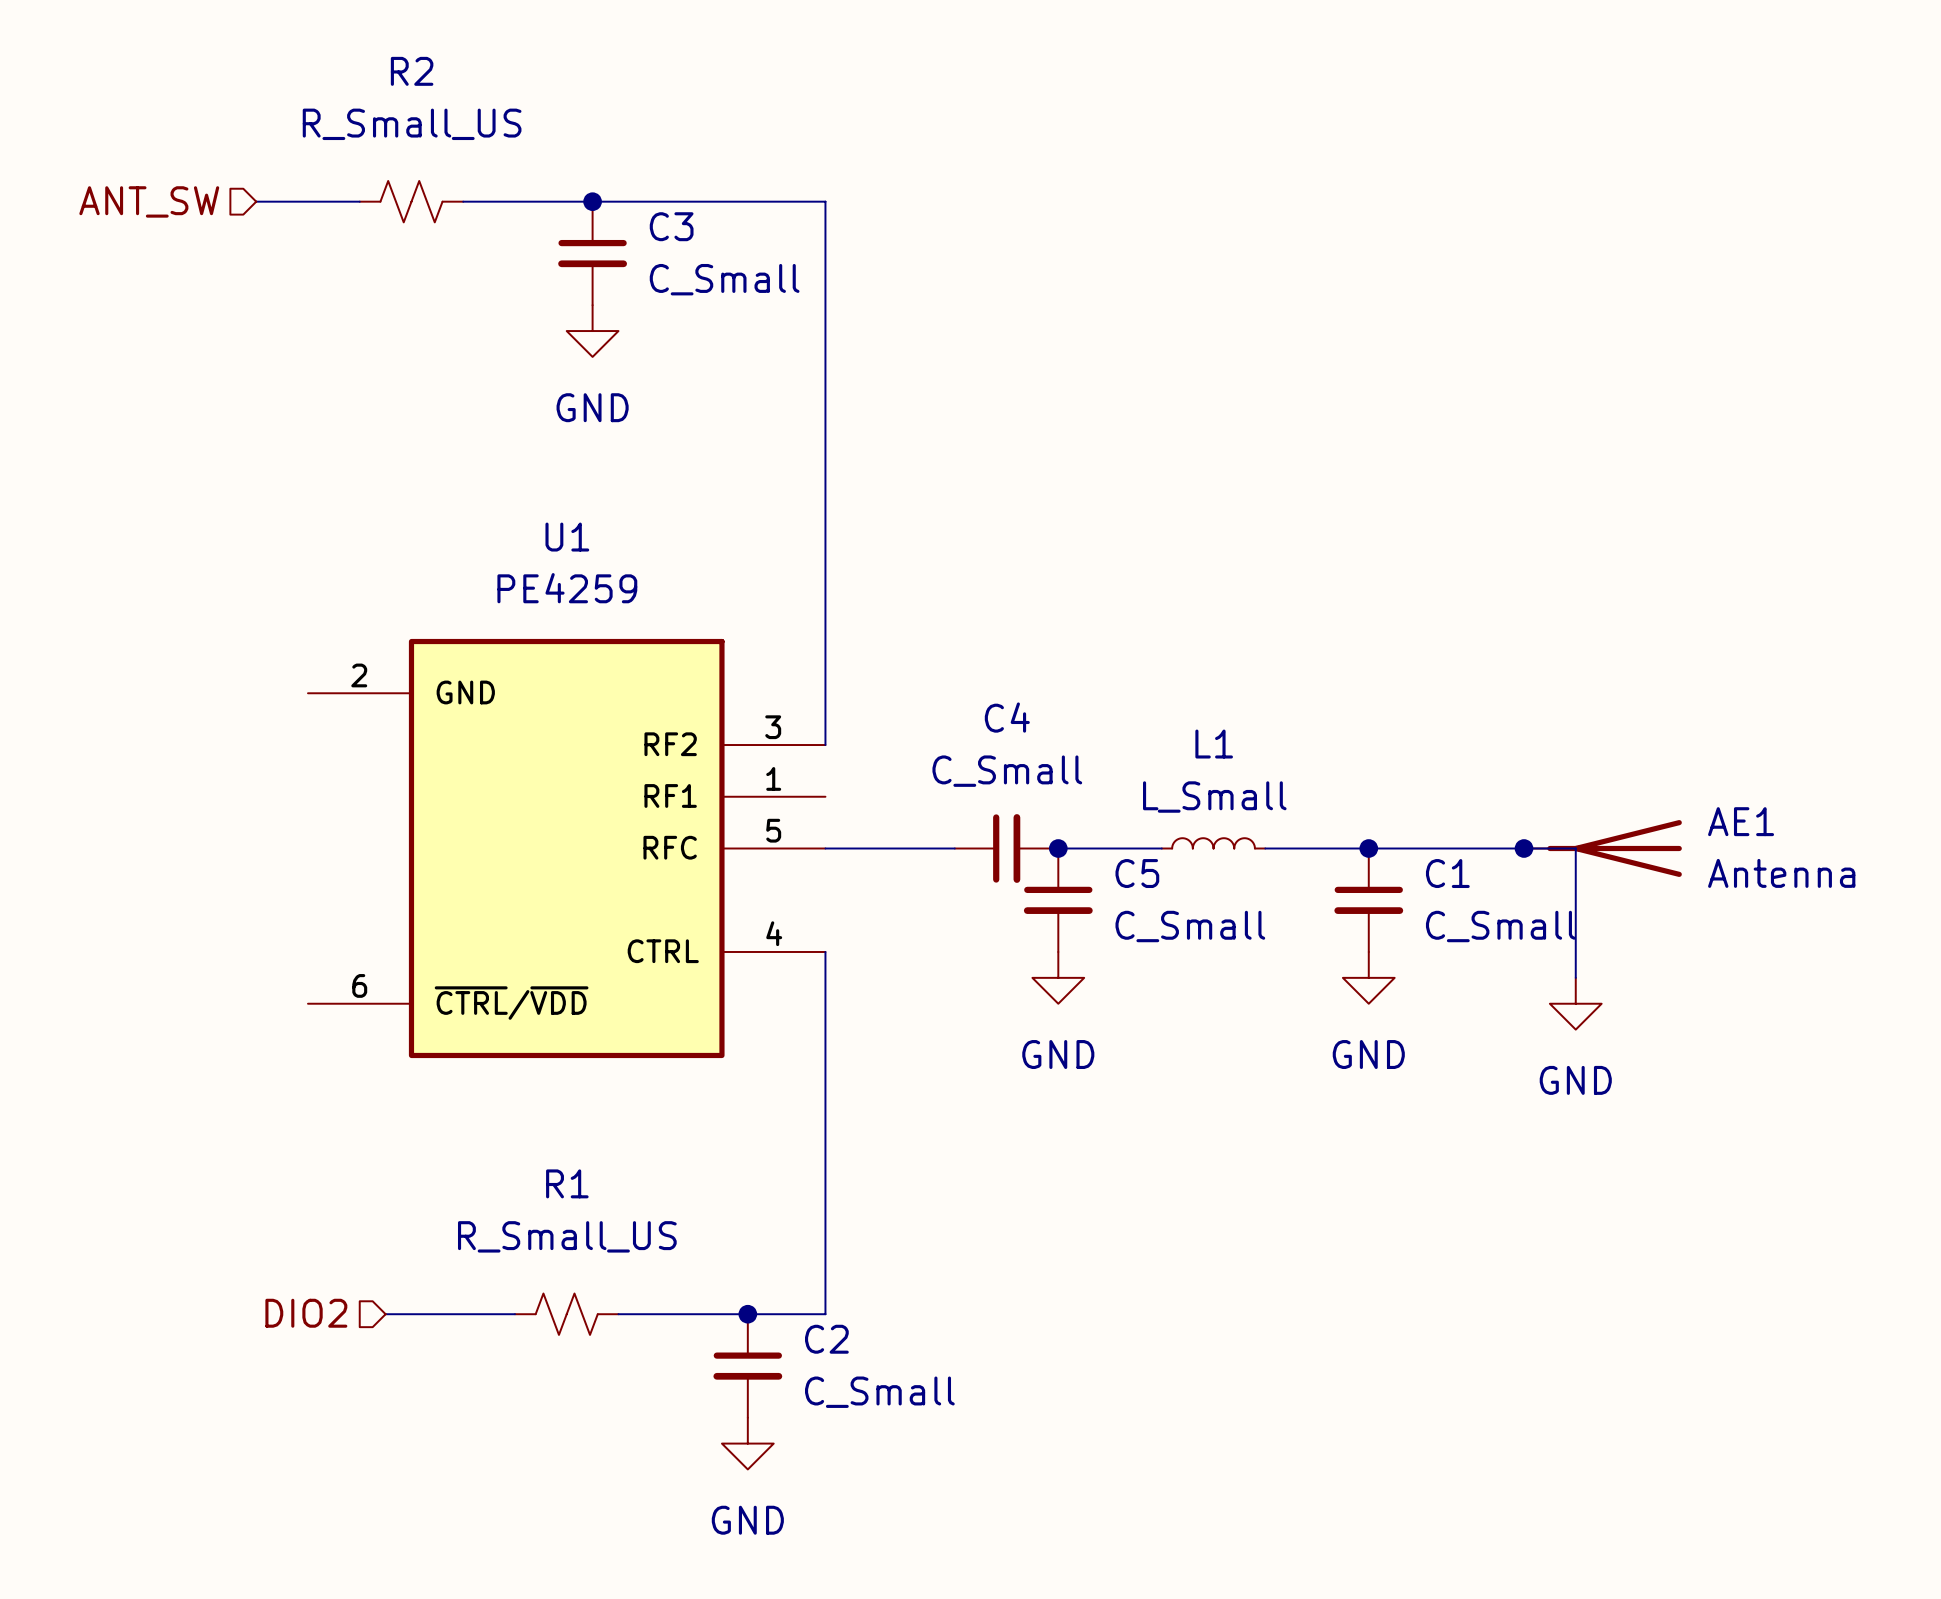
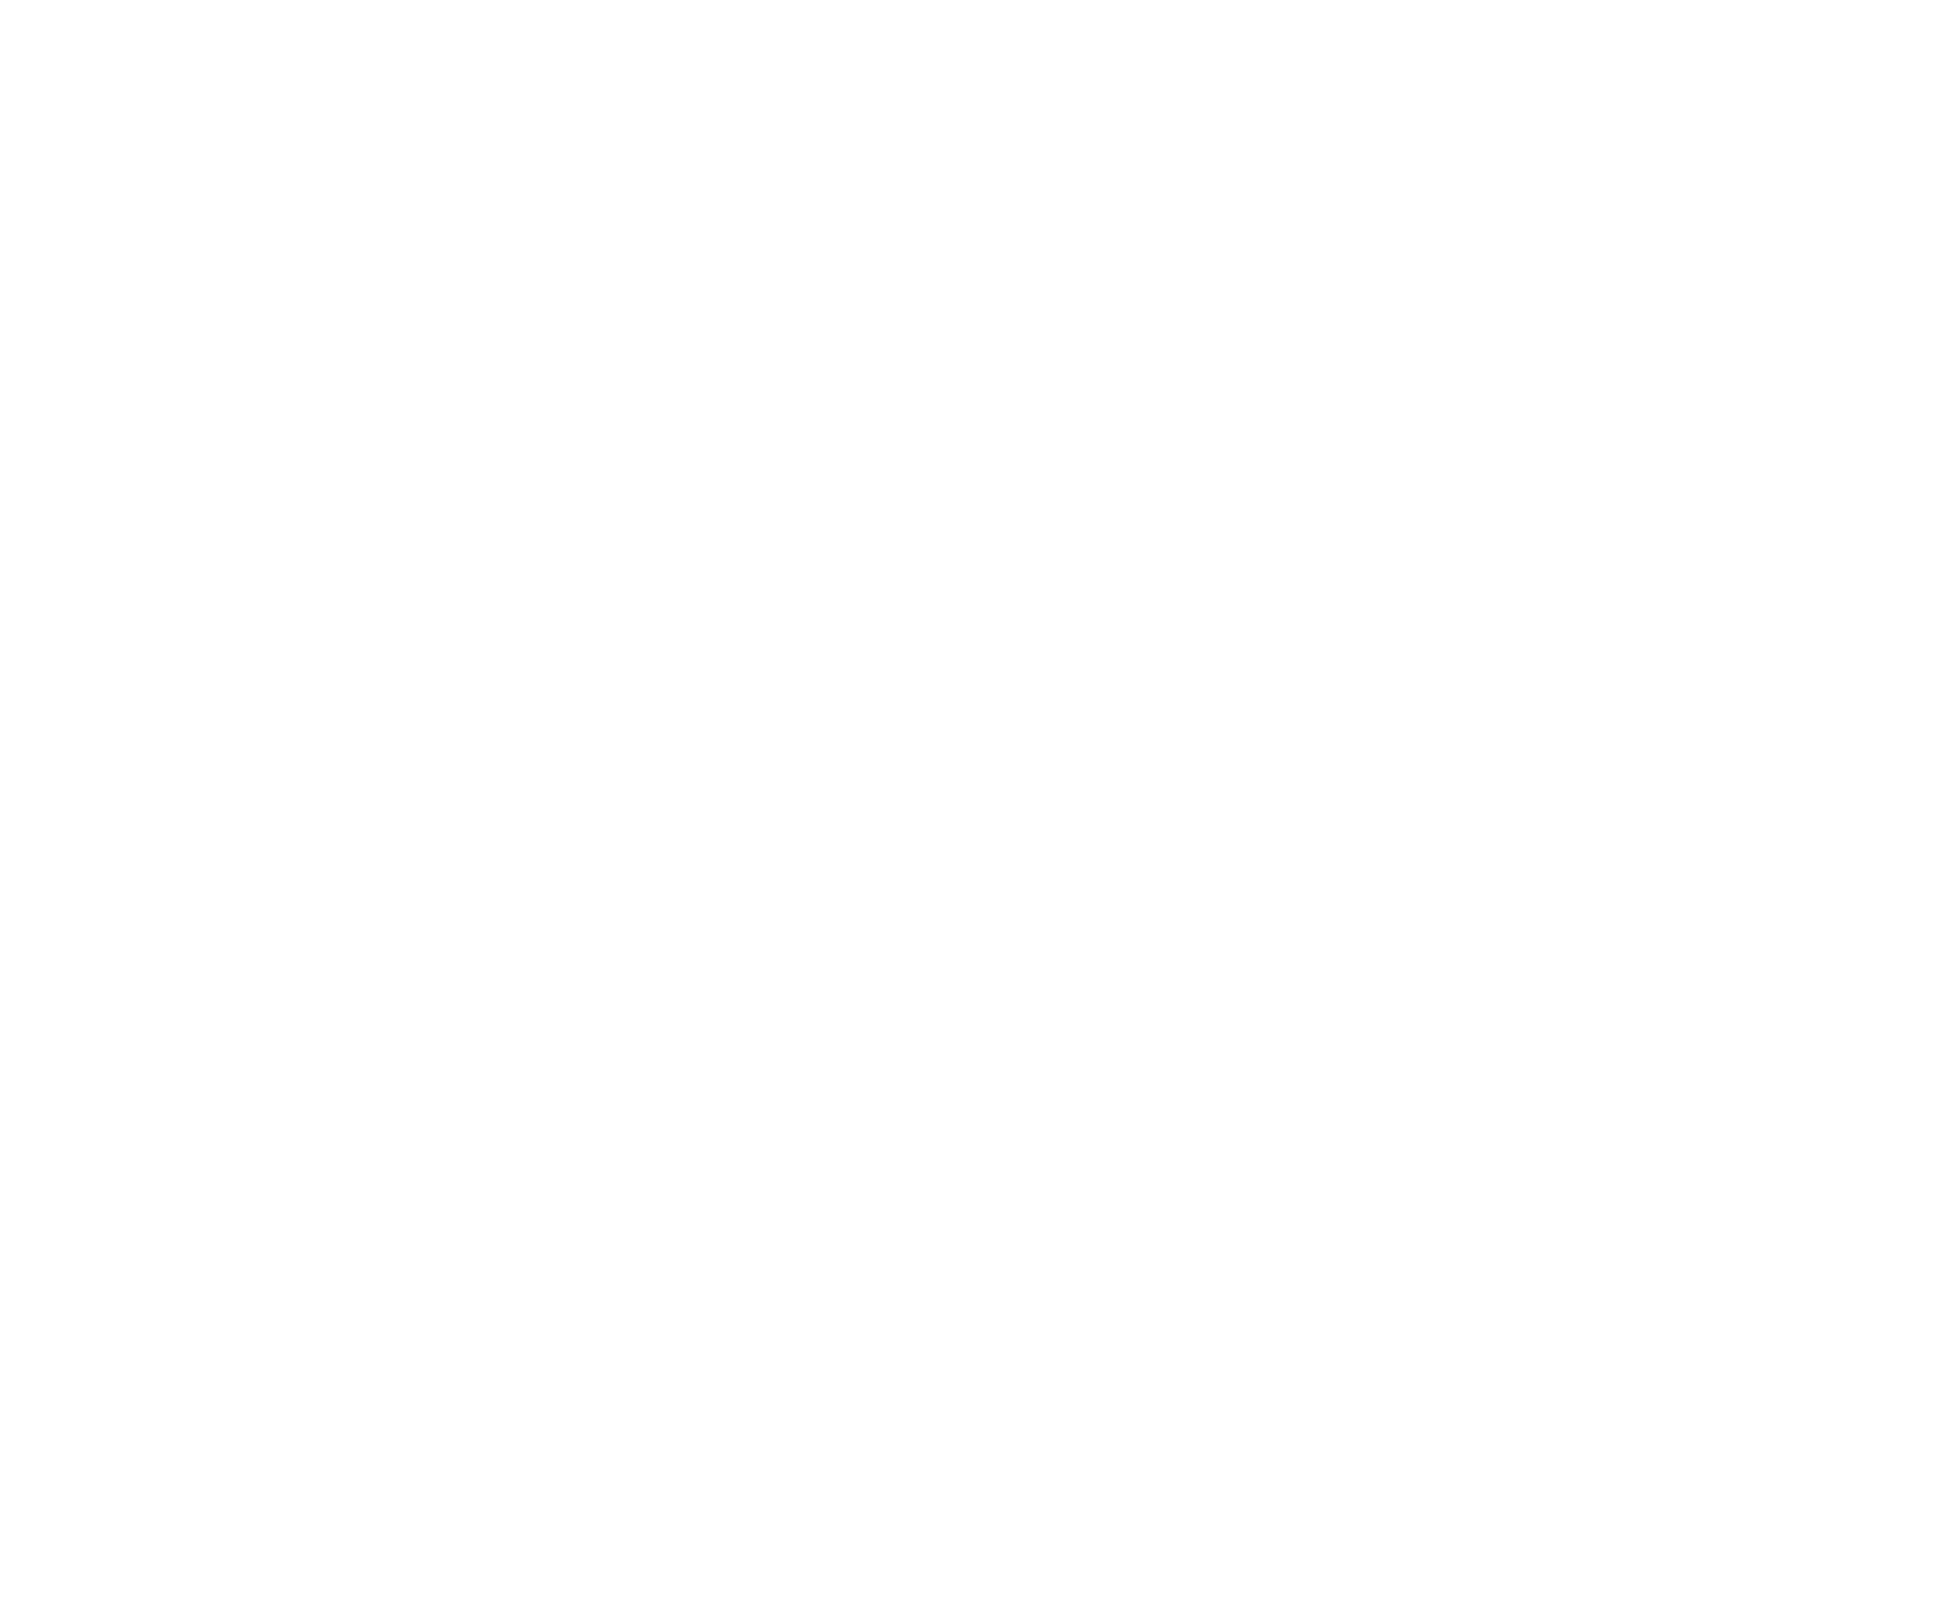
hierarchical label: ANT_SW (149, 201) -> none
wire: (256, 201) (359, 201) -> none
R2: R_Small_US (411, 201) -> none
wire: (463, 201) (825, 201) (825, 745) -> none
junction: (592, 201) -> none
C3: C_Small (592, 253) -> none
power symbol: GND (592, 331) -> none
L1: L_Small (1213, 843) -> none
U1: PE4259 (566, 848) -> none
wire: (825, 848) (954, 848) -> none
C4: C_Small (1006, 848) -> none
wire: (1058, 848) (1161, 848) -> none
junction: (1058, 848) -> none
wire: (1265, 848) (1575, 848) (1575, 977) -> none
junction: (1368, 848) -> none
junction: (1524, 848) -> none
AE1: Antenna (1602, 848) -> none
C5: C_Small (1058, 900) -> none
C1: C_Small (1368, 900) -> none
wire: (825, 951) (825, 1314) (618, 1314) -> none
power symbol: GND (1058, 977) -> none
power symbol: GND (1368, 977) -> none
power symbol: GND (1575, 1003) -> none
hierarchical label: DIO2 (306, 1313) -> none
wire: (385, 1314) (514, 1314) -> none
R1: R_Small_US (566, 1314) -> none
junction: (747, 1314) -> none
C2: C_Small (747, 1365) -> none
power symbol: GND (747, 1443) -> none

